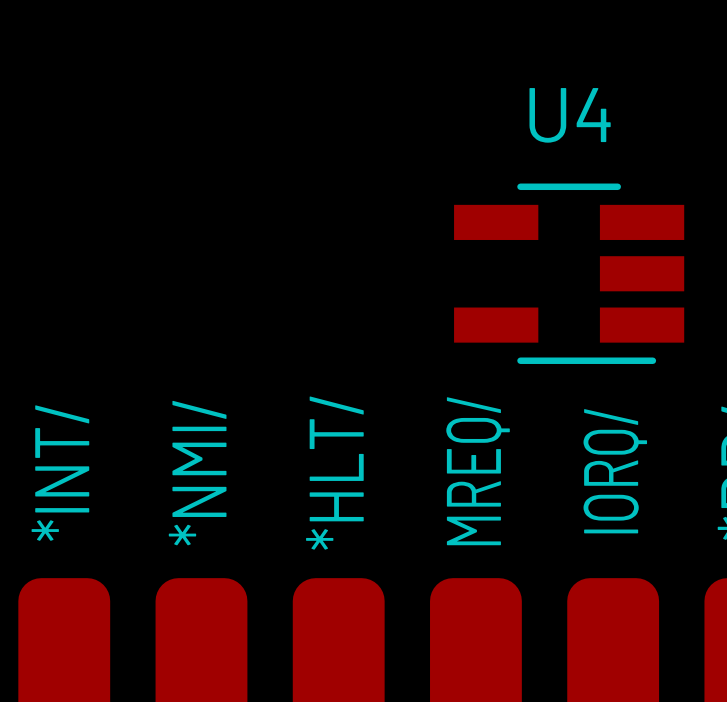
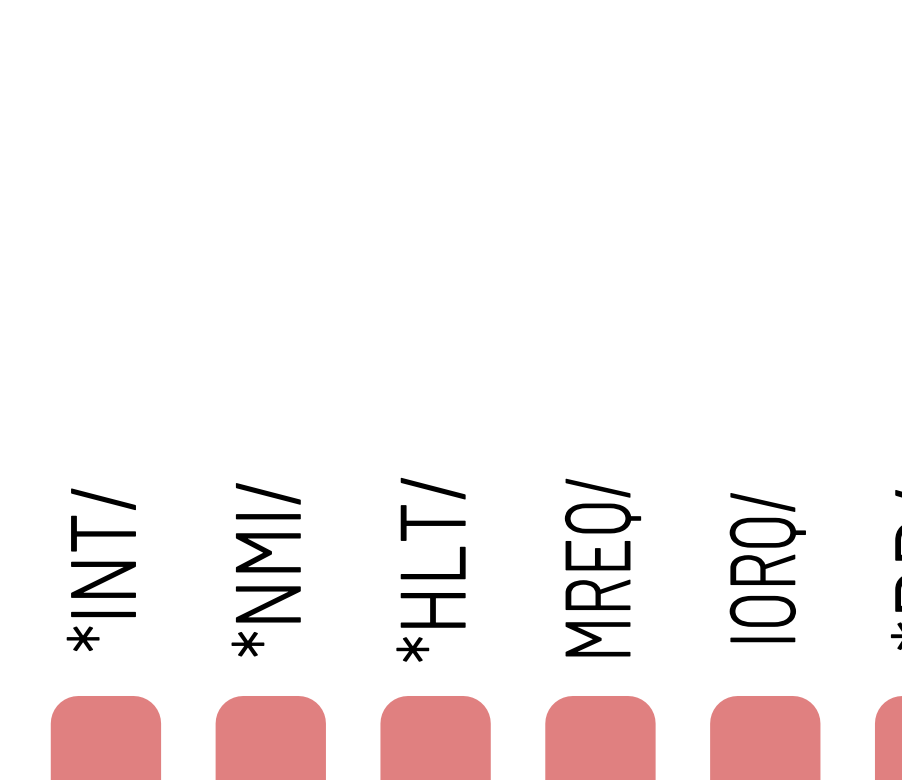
U4: (569, 273) -> none

